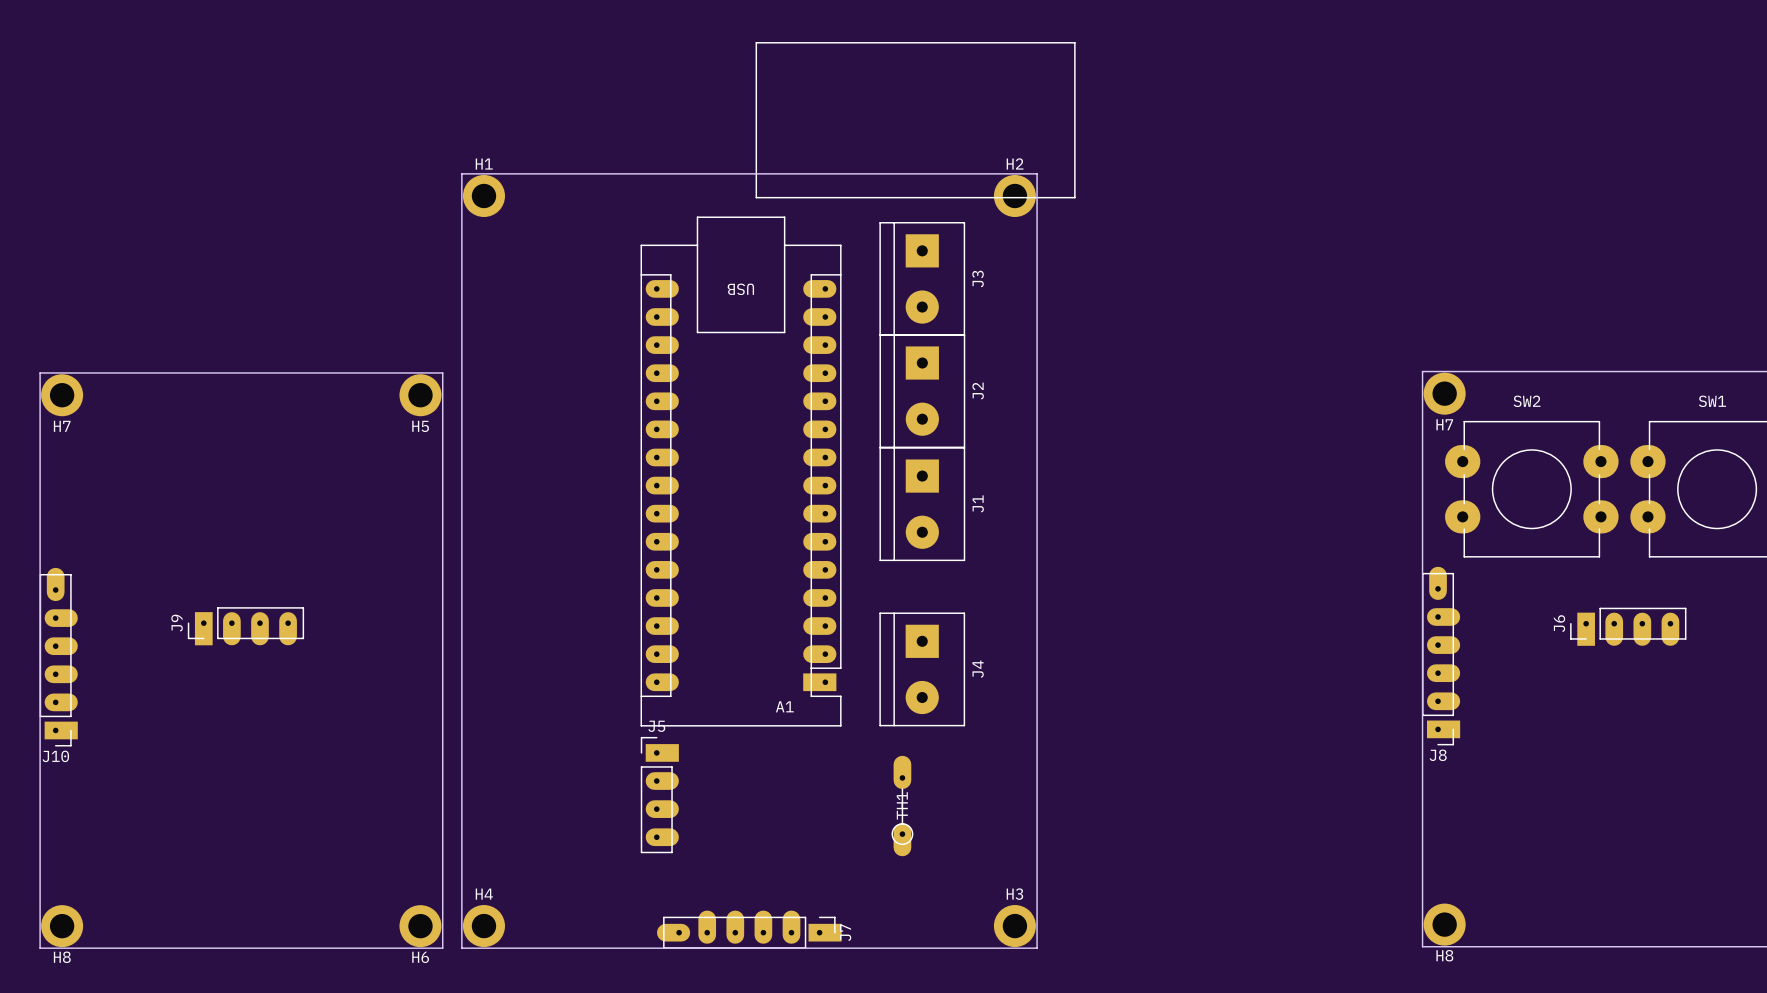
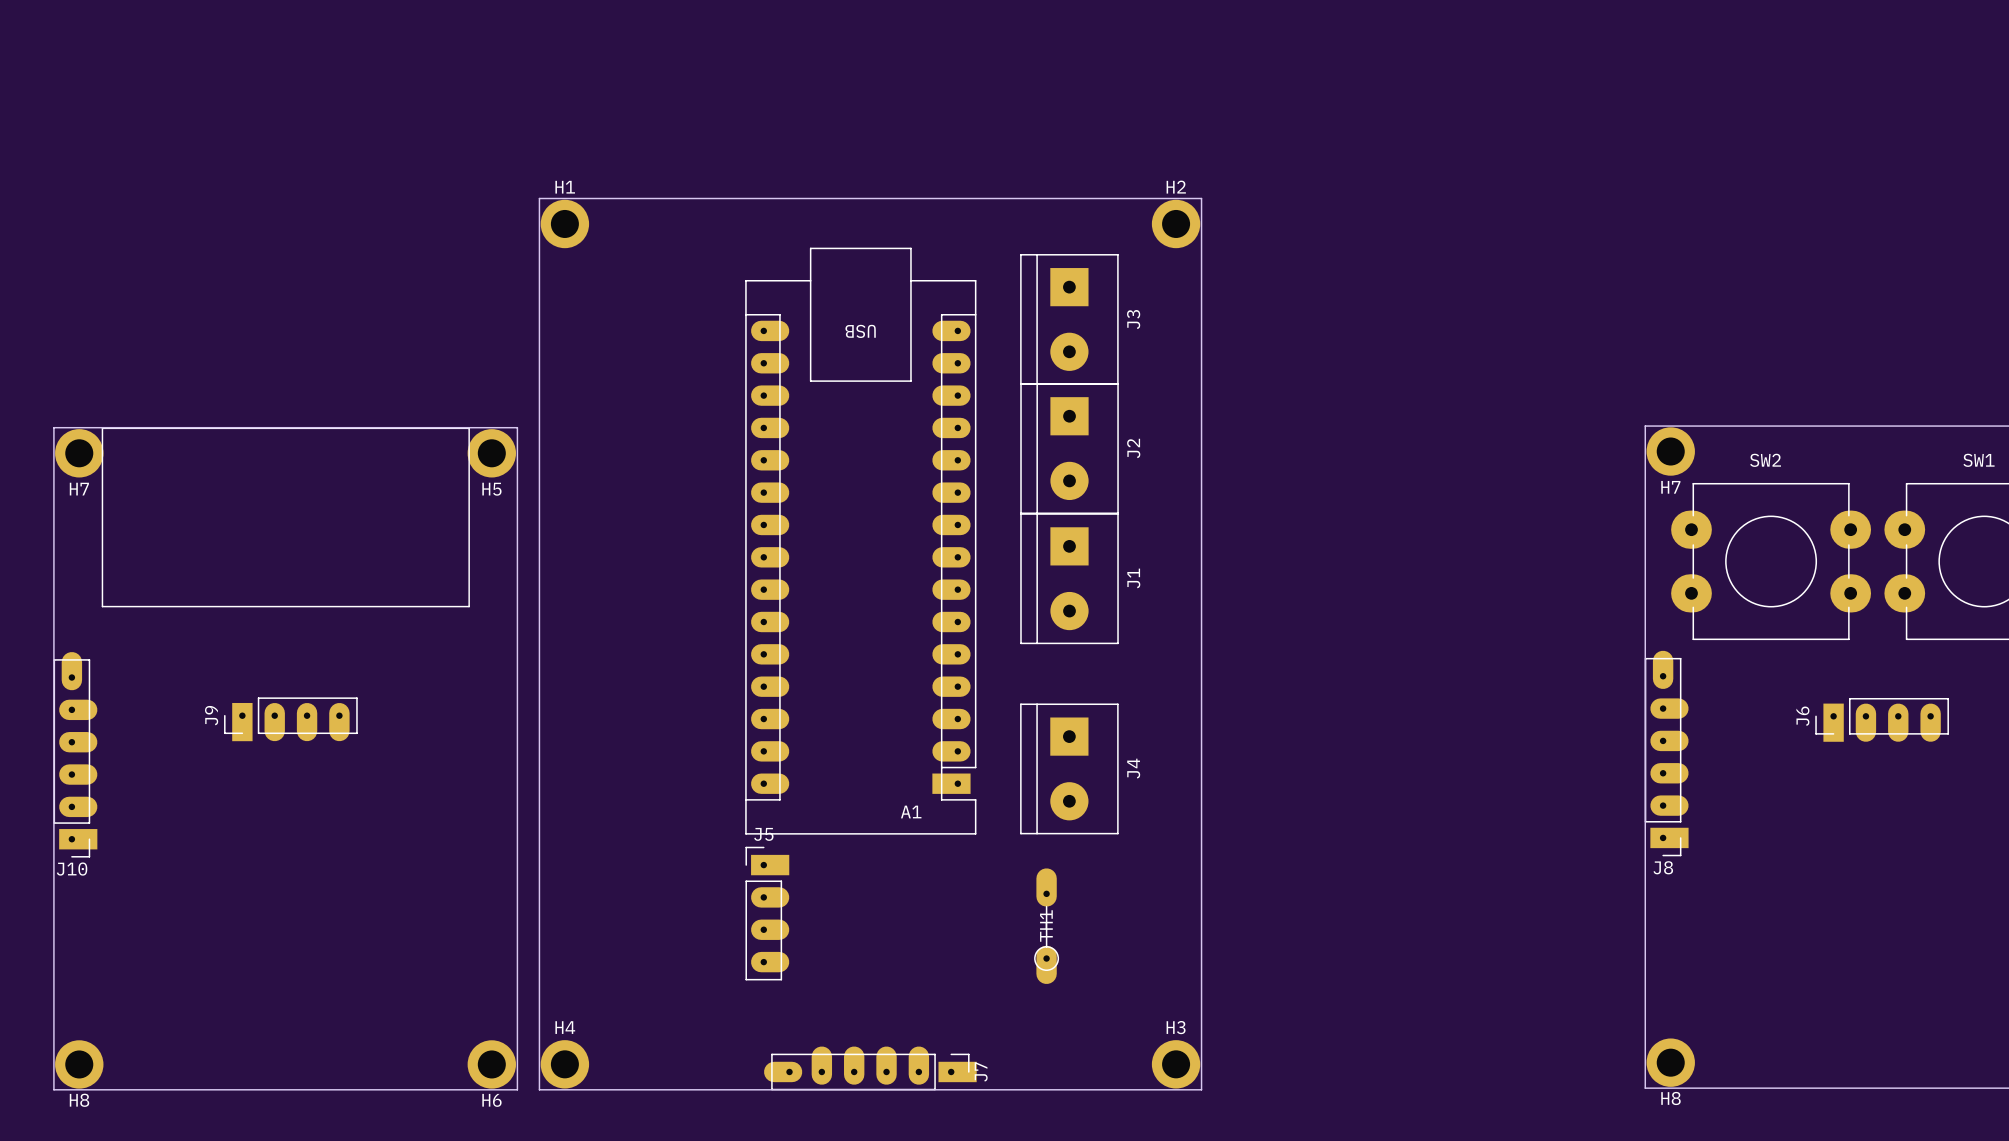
line: (756, 42) (1074, 42) (1074, 197) (756, 197) (756, 42) -> none
line: none -> (102, 428) (469, 428) (469, 606) (102, 606) (102, 428)

